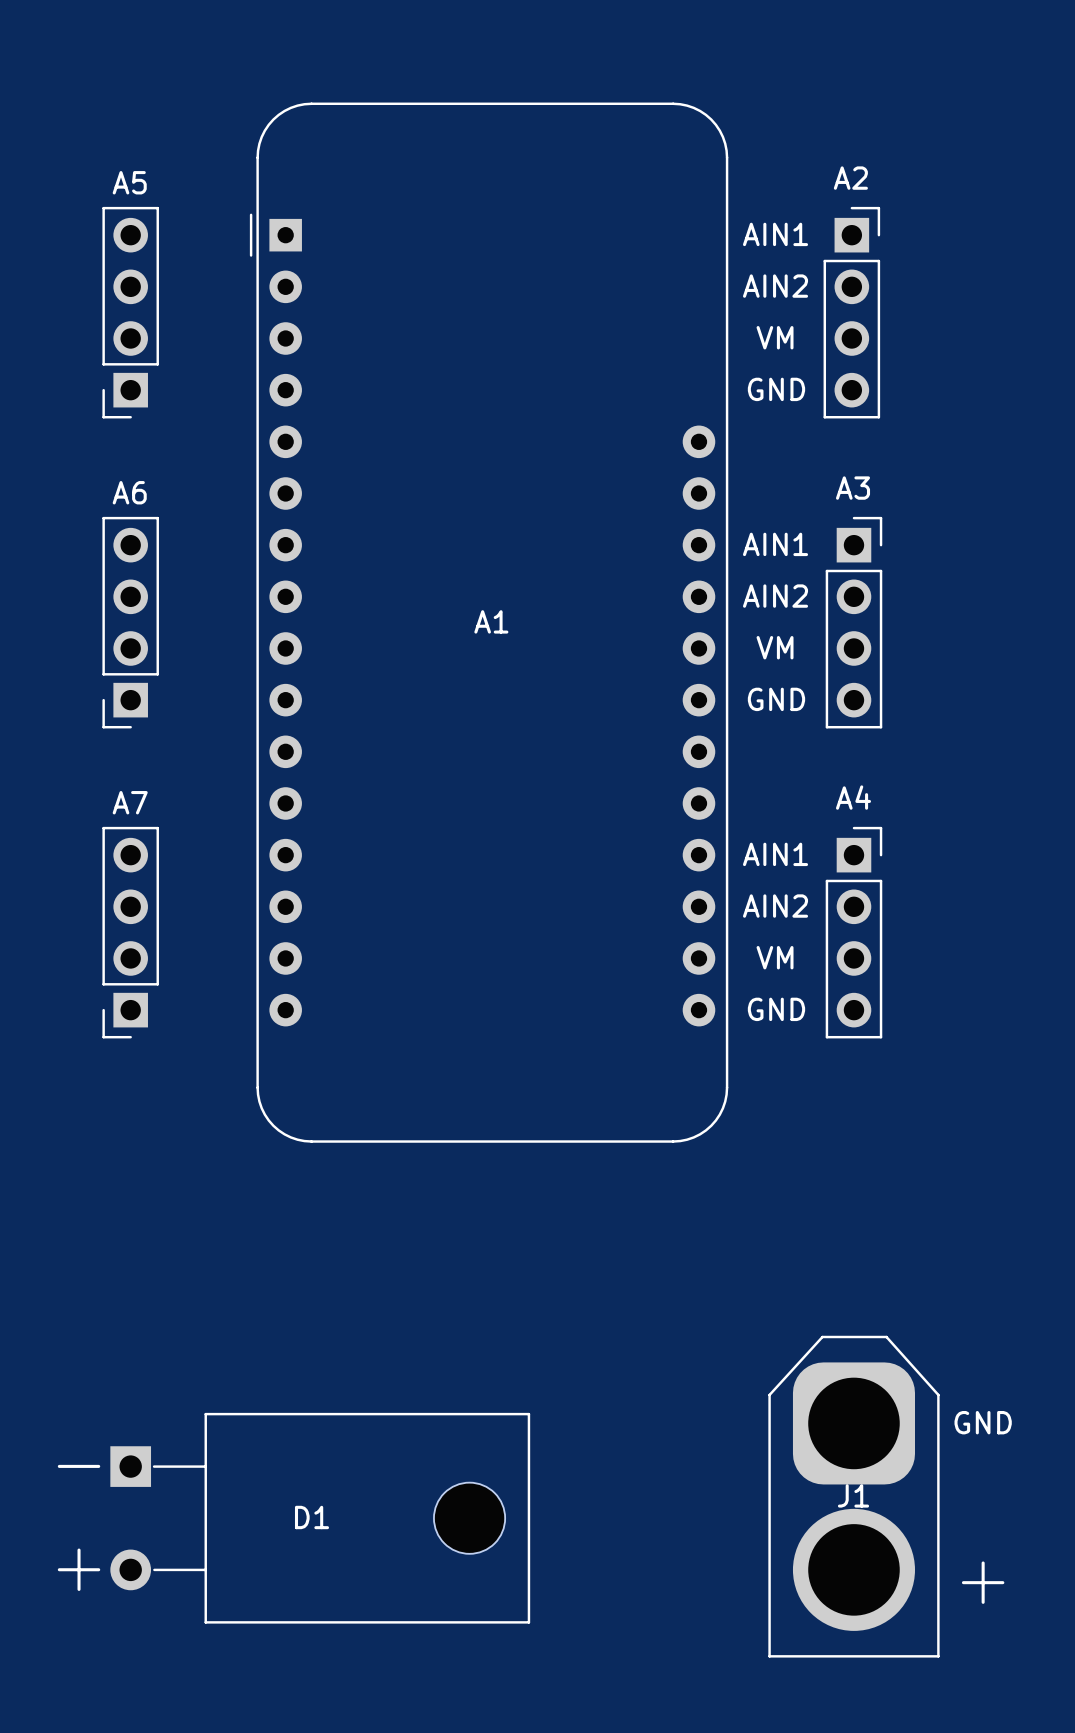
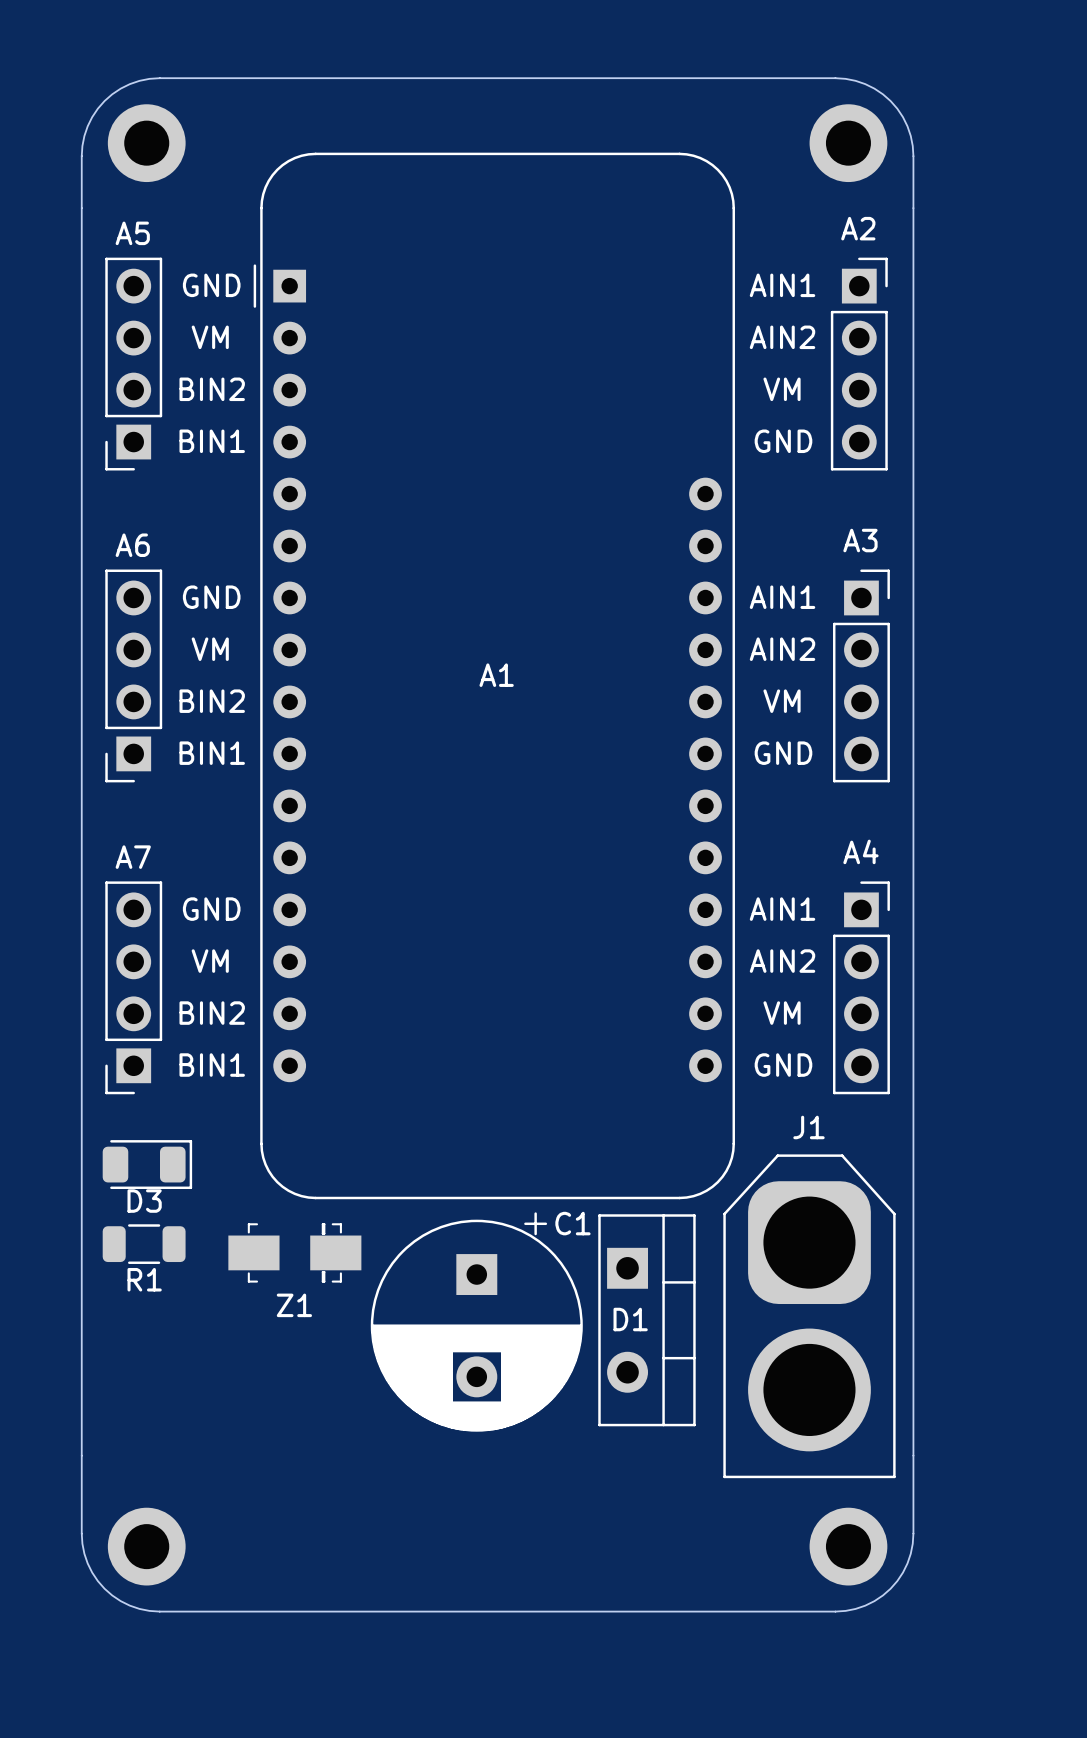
board edge: none -> (159, 78) (835, 78) (855, 80) (874, 88) (897, 108) (907, 126) (913, 156) (913, 1533) (910, 1553) (902, 1572) (882, 1595) (865, 1605) (835, 1611) (159, 1611) (139, 1608) (120, 1601) (97, 1581) (87, 1563) (81, 1533) (81, 156) (87, 126) (104, 101) (129, 84) (159, 78)
part: none -> (146, 143)
part: none -> (848, 143)
text: none -> GND (211, 285)
text: none -> VM (210, 337)
text: none -> BIN2 (212, 389)
text: none -> BIN1 (212, 441)
text: none -> GND (211, 597)
text: none -> VM (210, 649)
text: none -> BIN2 (212, 701)
text: none -> BIN1 (212, 753)
text: none -> GND (211, 909)
text: none -> VM (210, 961)
text: none -> BIN2 (212, 1013)
text: none -> BIN1 (212, 1065)
D3: none -> (147, 1164)
R1: none -> (144, 1244)
Z1: none -> (294, 1252)
C1: none -> (476, 1322)
D1 footprint: [110, 1412, 531, 1624] -> [598, 1214, 696, 1427]
text: GND (983, 1422) -> none
text: - (79, 1466) -> none
part: none -> (146, 1546)
part: none -> (848, 1546)
J1 name position: J1 (853, 1495) -> J1 (808, 1127)
J1 position: (853, 1496) -> (809, 1316)
text: + (79, 1569) -> none
text: + (983, 1582) -> none

